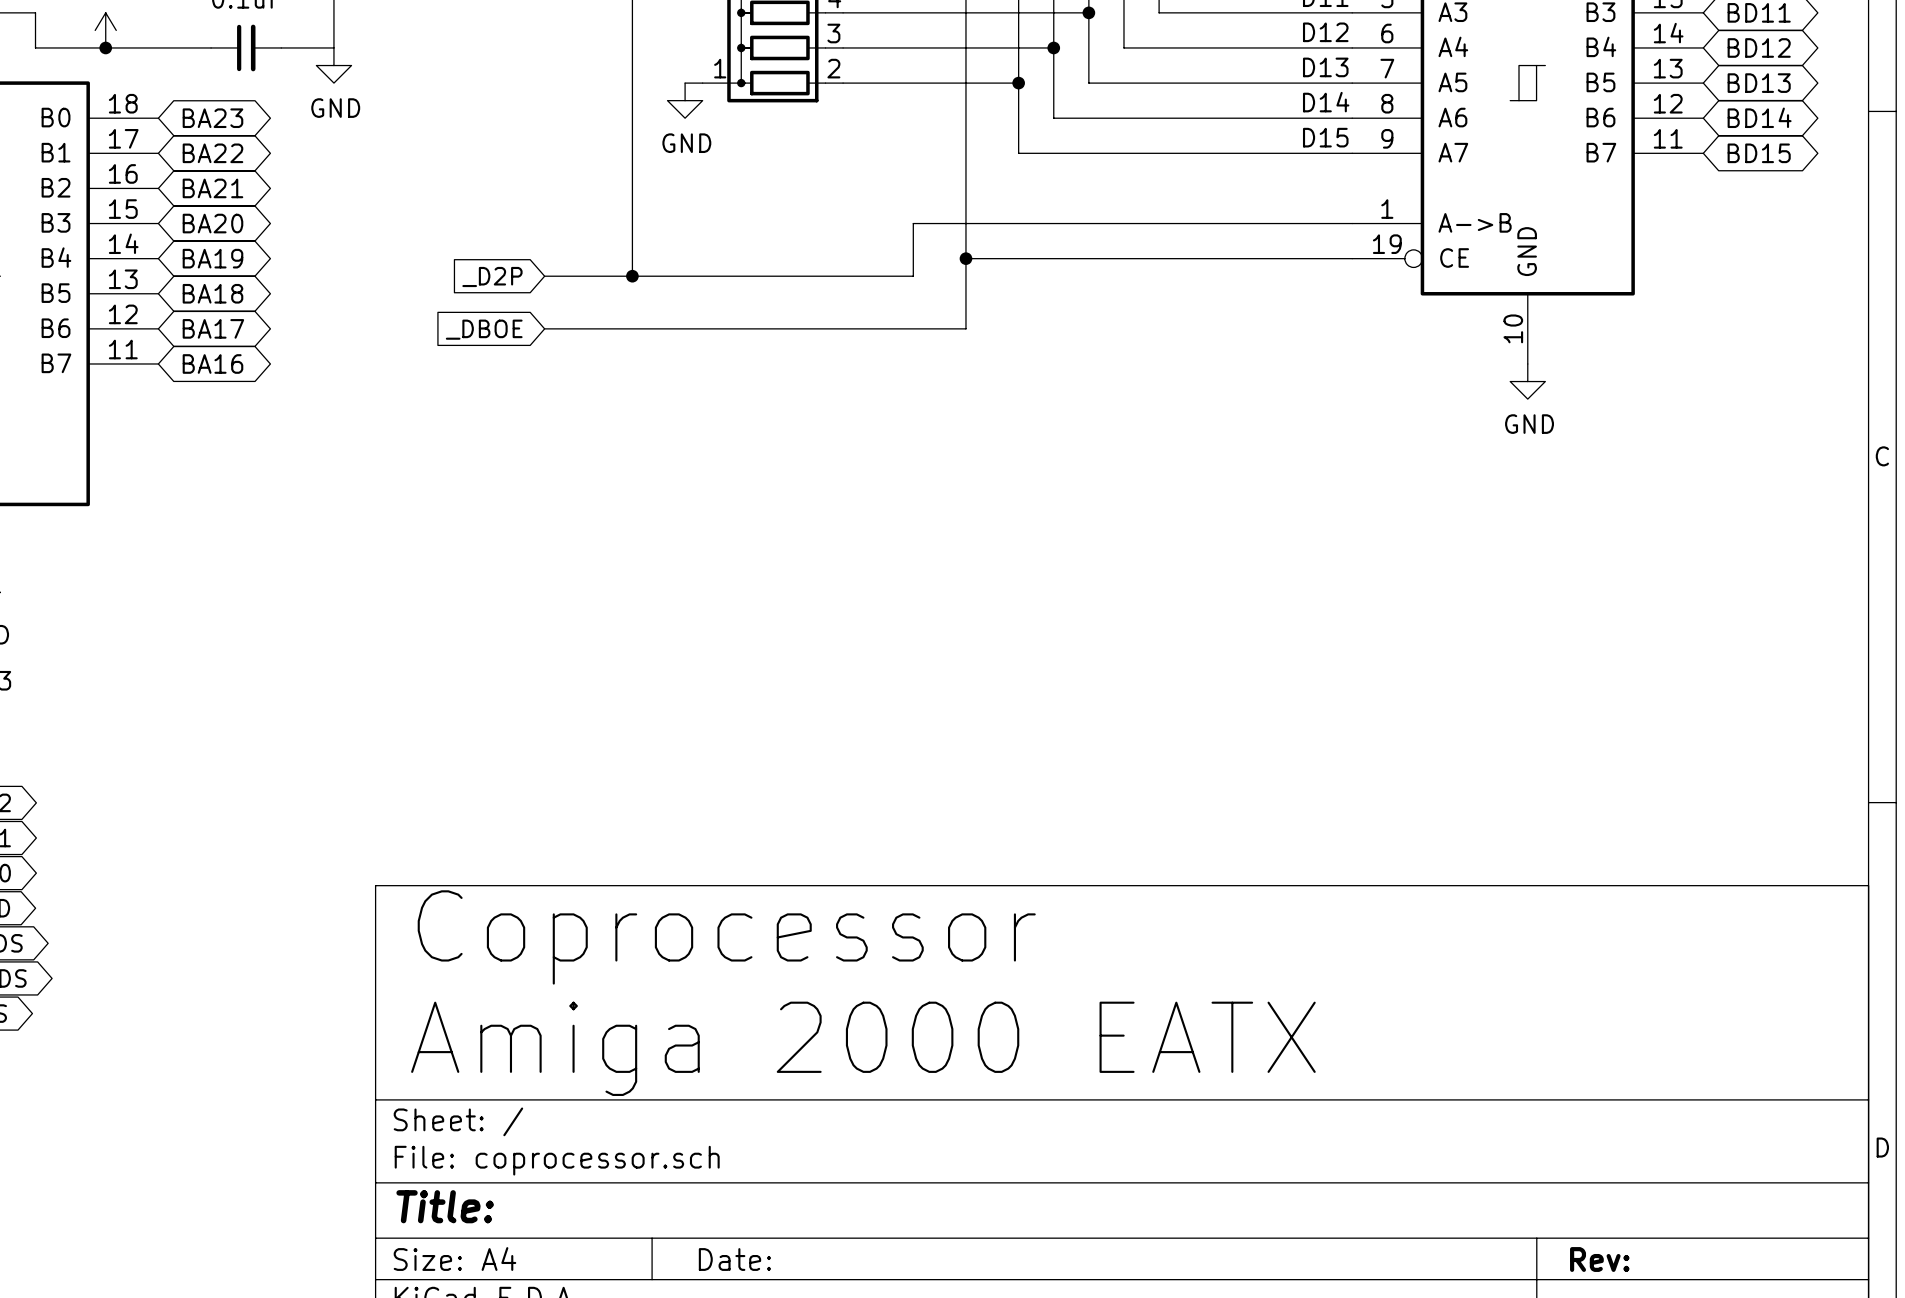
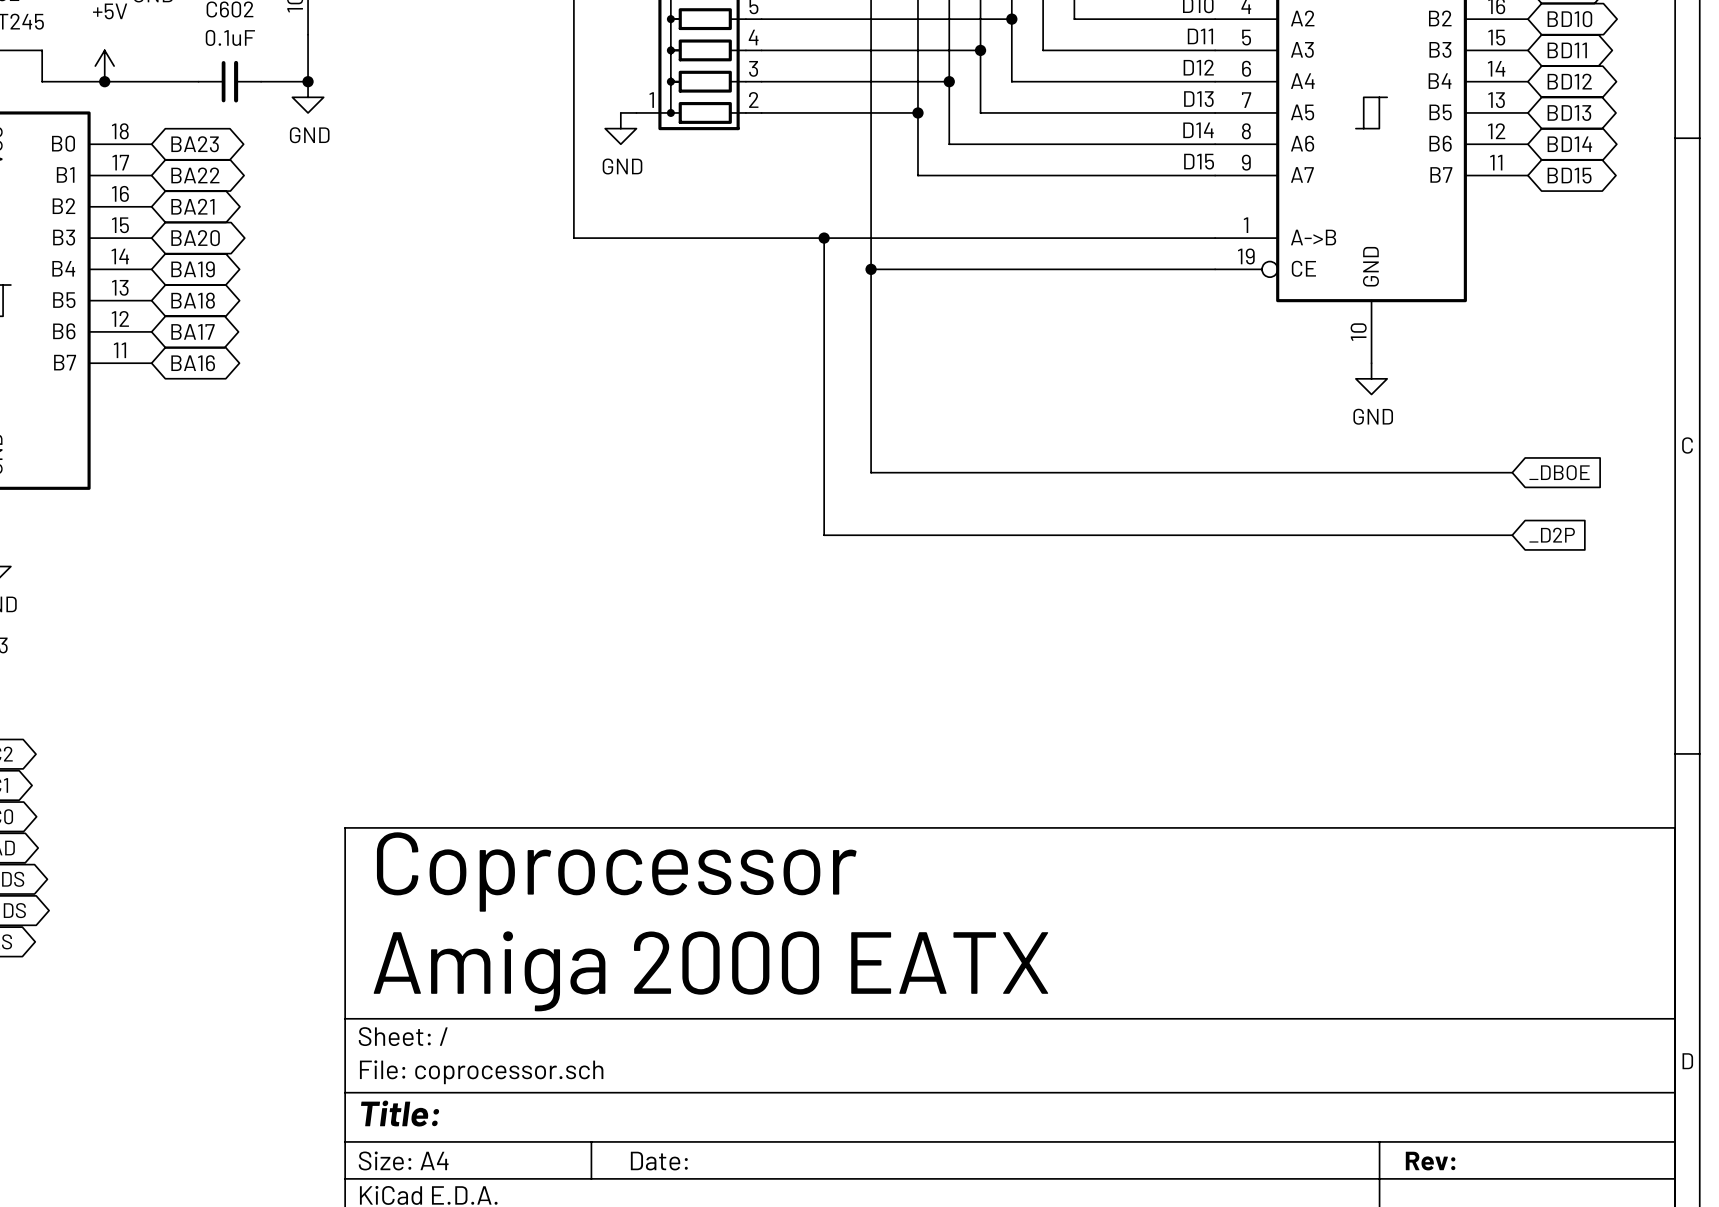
junction: none -> (308, 81)
wire: (632, 223) (632, 276) -> (573, 238) (824, 238)
junction: none -> (824, 238)
global label: _D2P (492, 276) -> none
wire: (544, 276) (913, 276) -> (1512, 535) (824, 535) (824, 285)
junction: (632, 276) -> none
wire: (544, 328) (965, 328) -> (1512, 472) (871, 472) (871, 331)
global label: _DBOE (484, 329) -> none
global label: none -> _DBOE (1559, 472)
global label: none -> _D2P (1552, 535)

